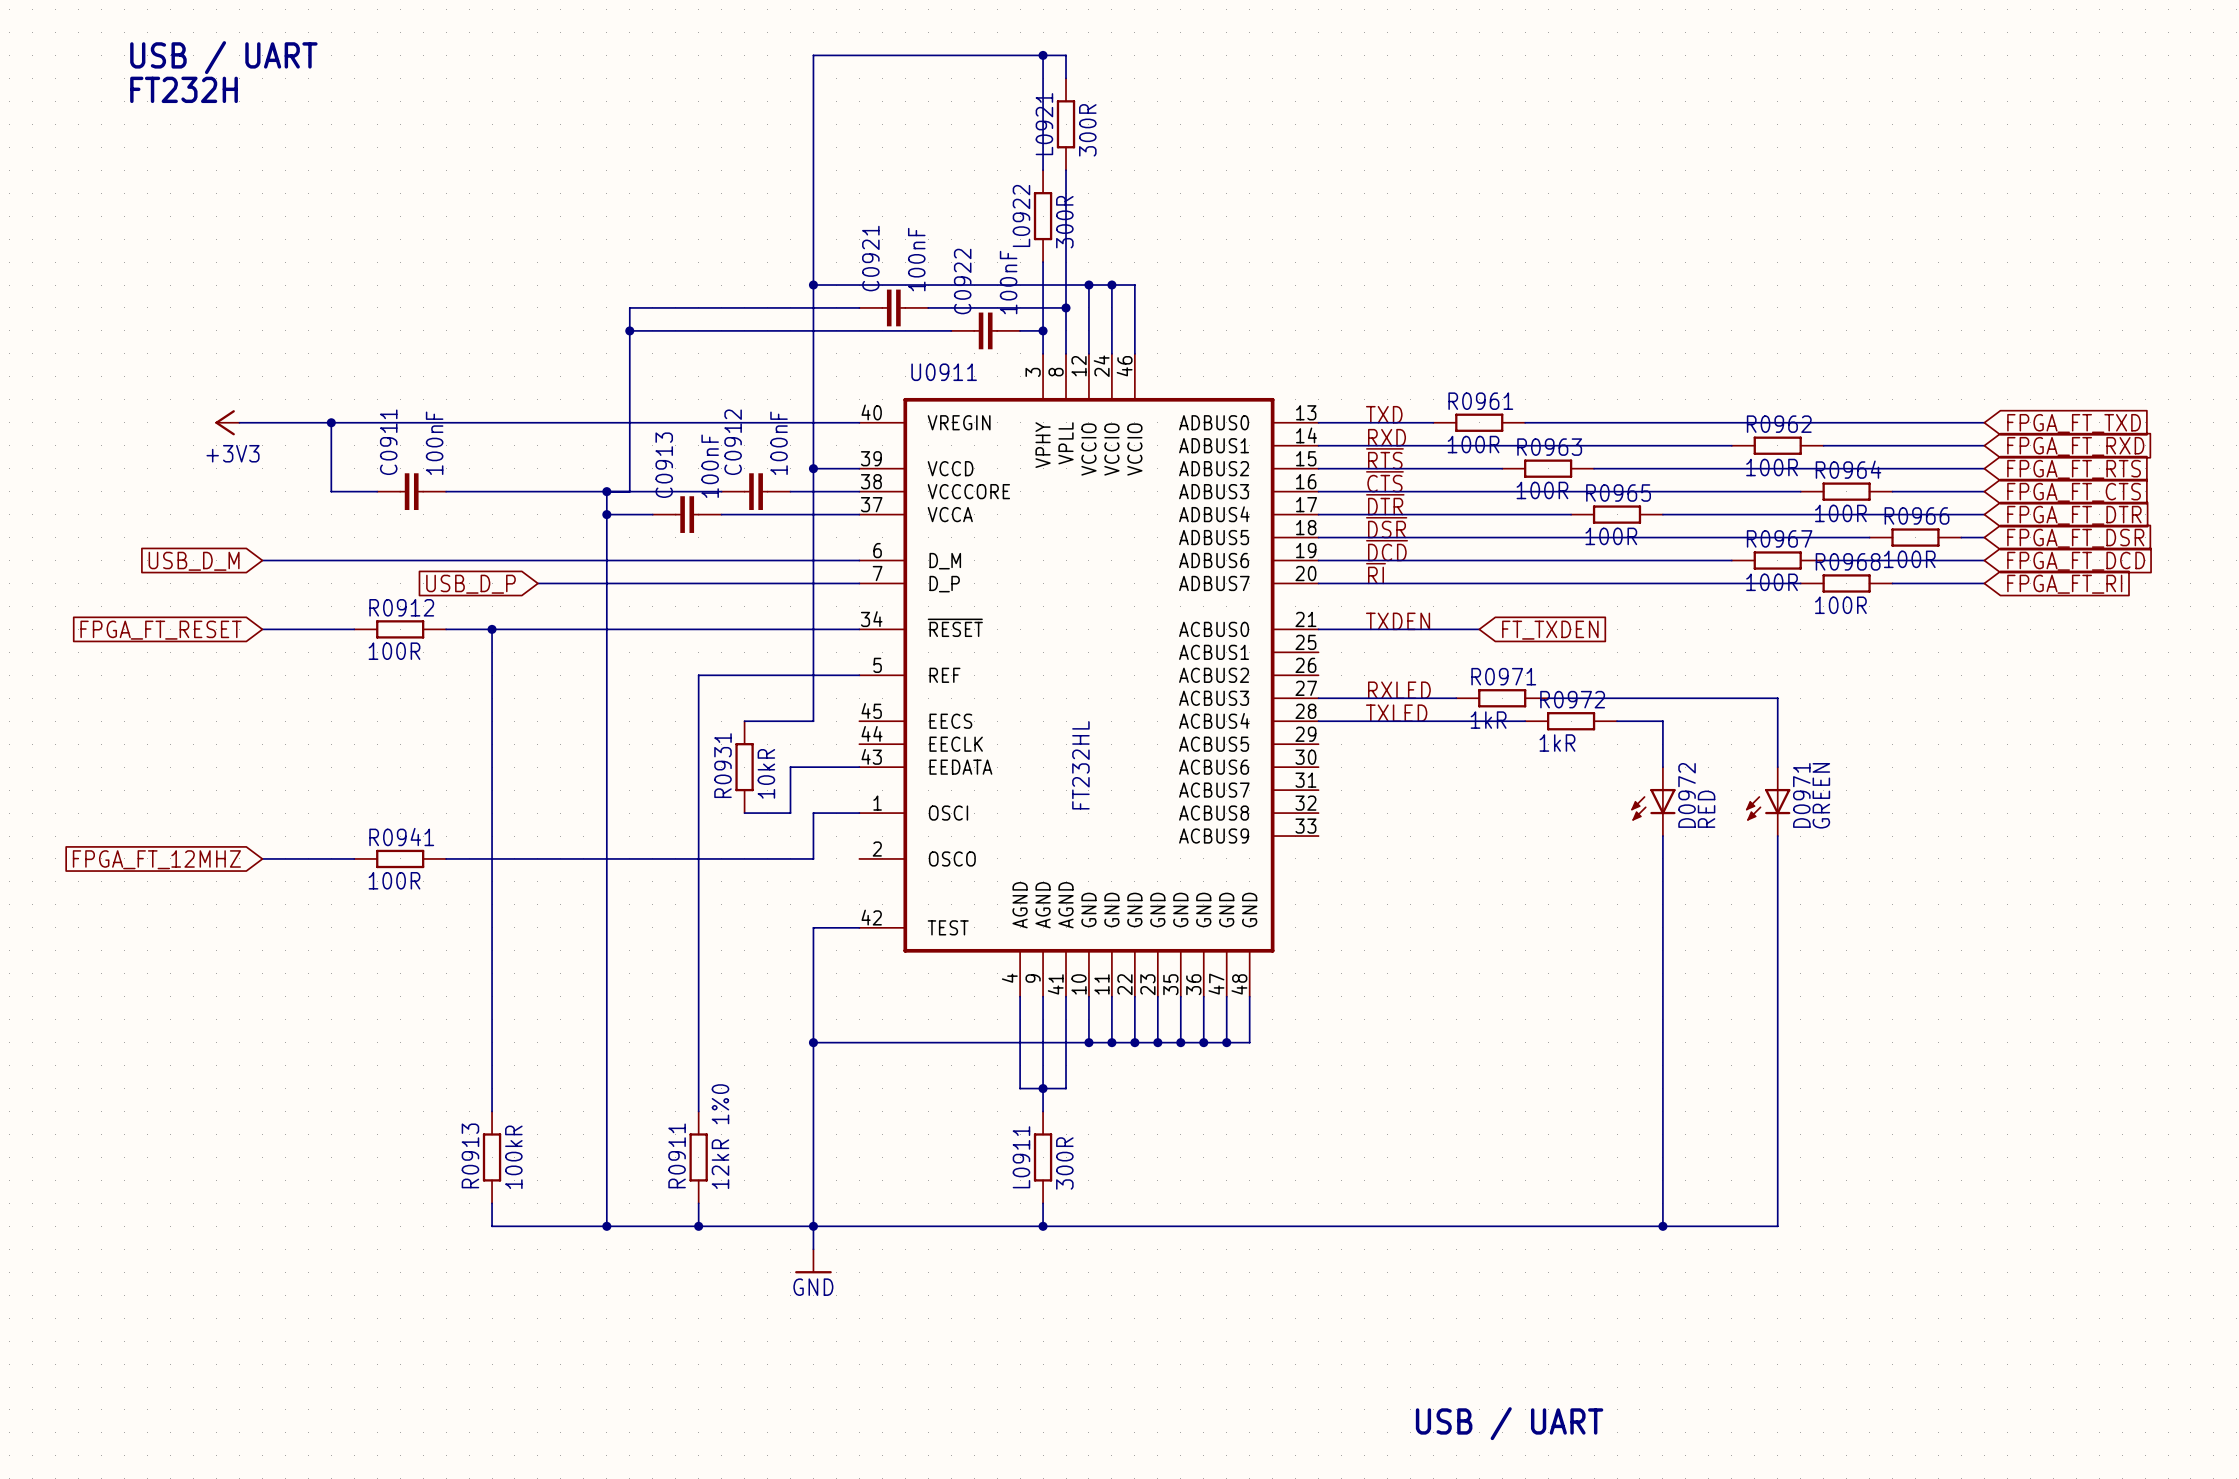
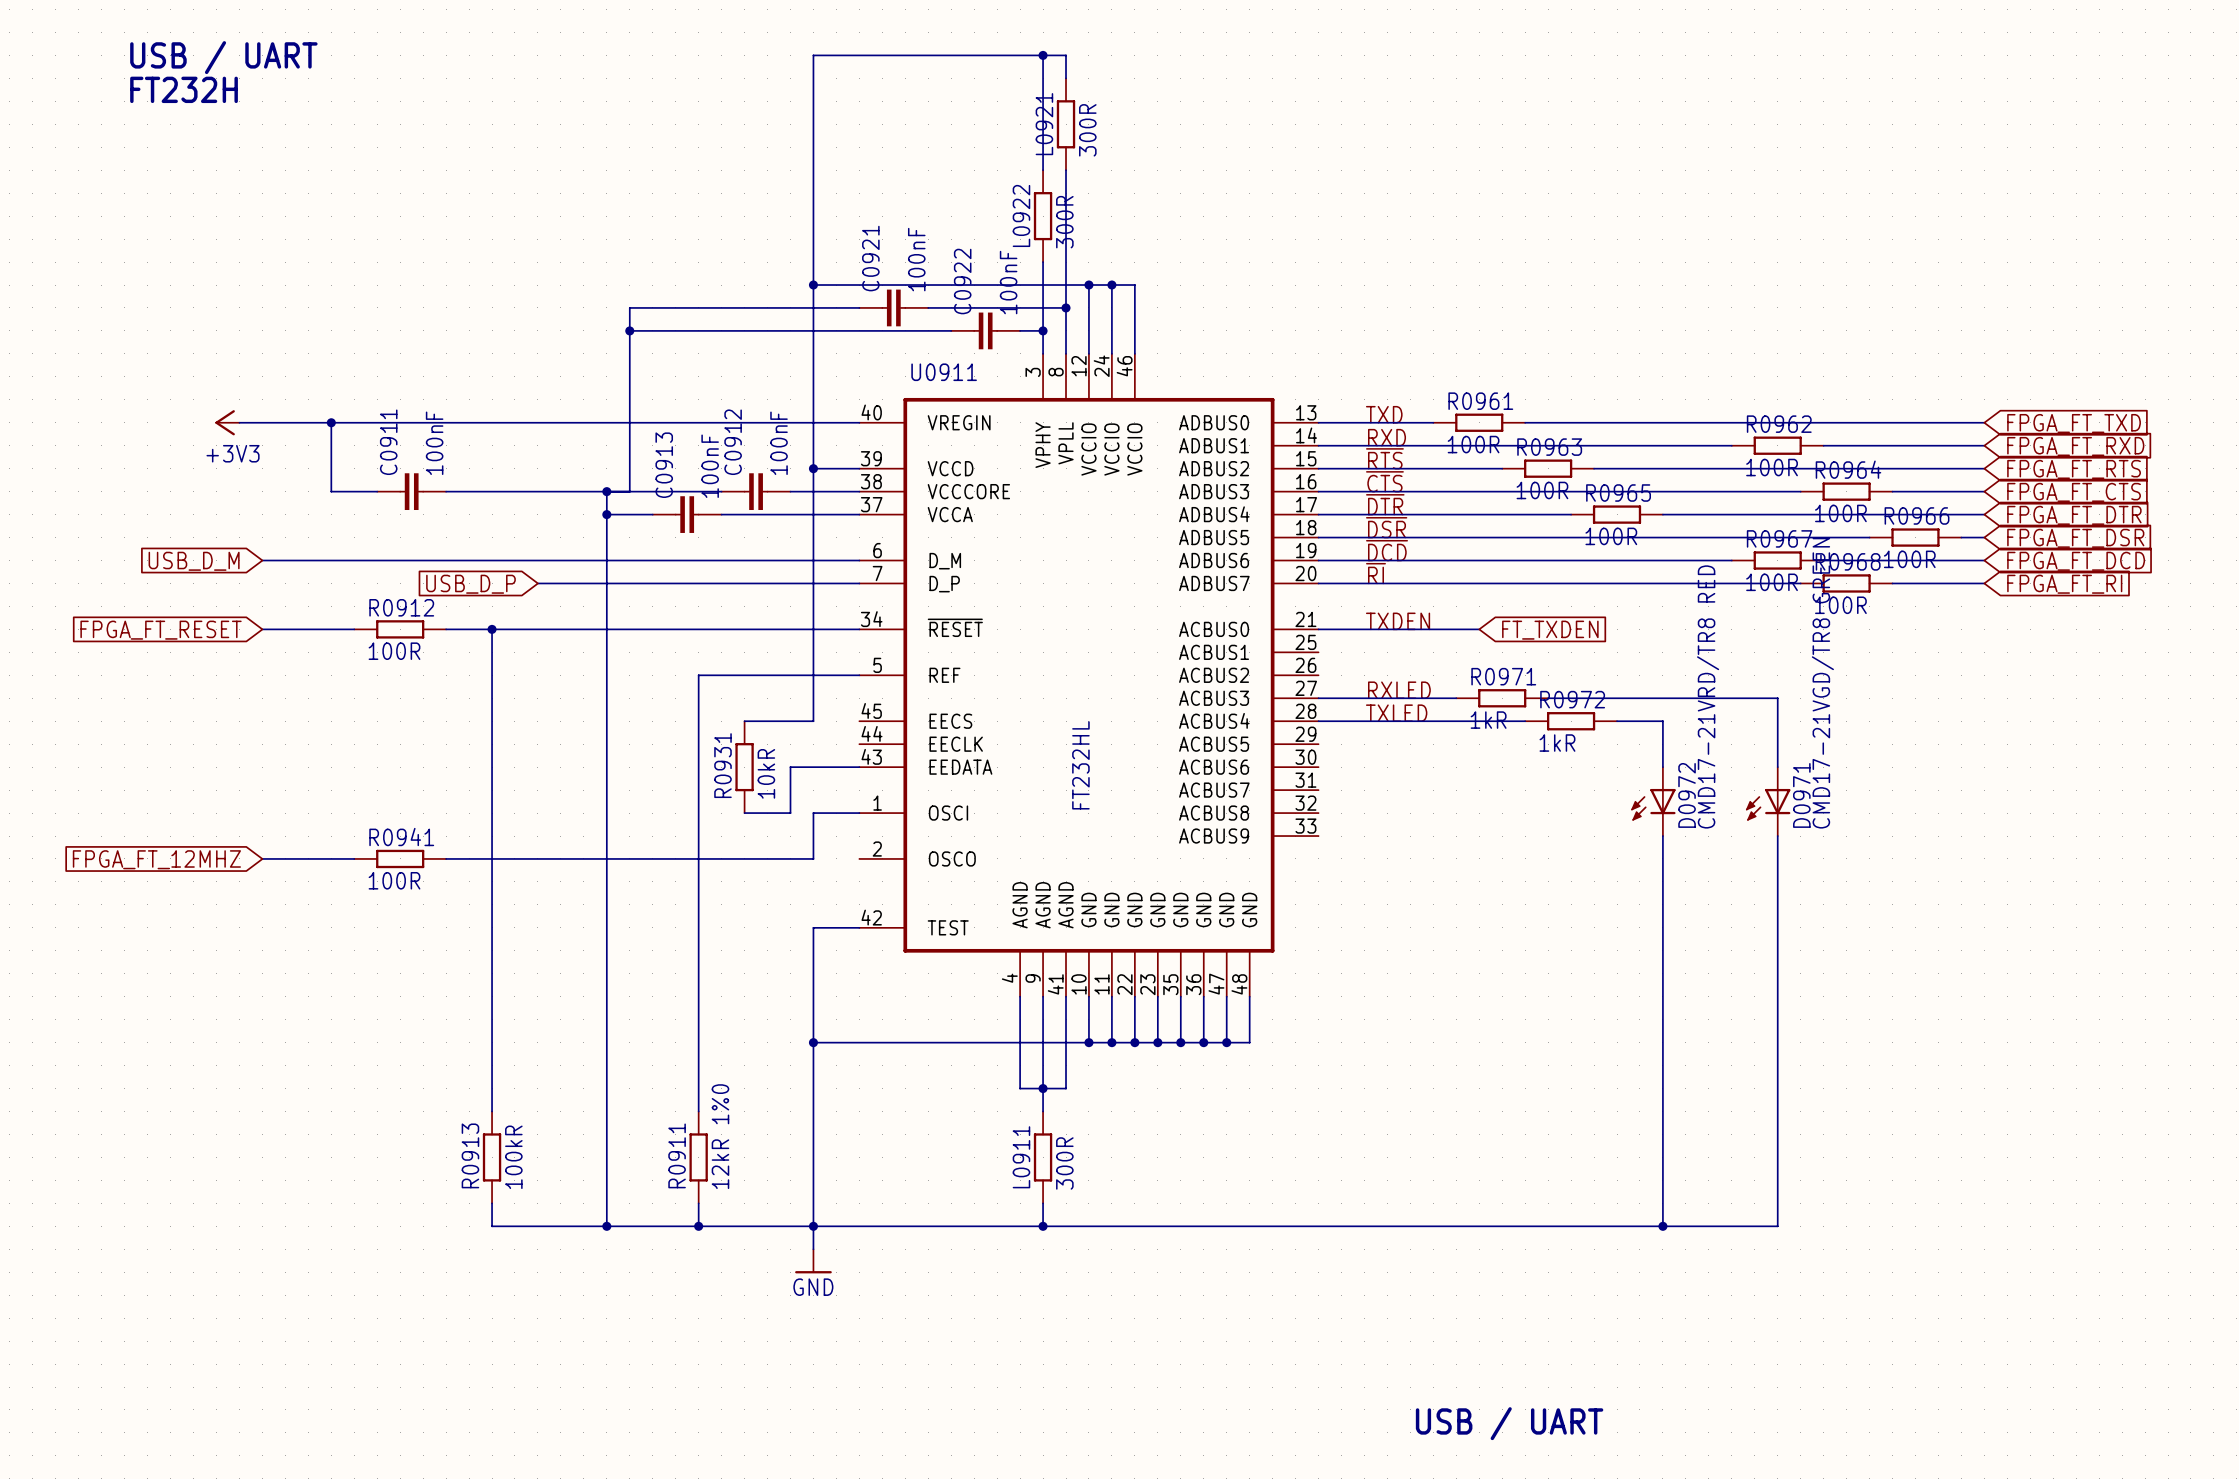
D0971 value: GREEN (1821, 795) -> CMD17-21VGD/TR8 GREEN (1822, 683)
D0972 value: RED (1706, 809) -> CMD17-21VRD/TR8 RED (1708, 696)

